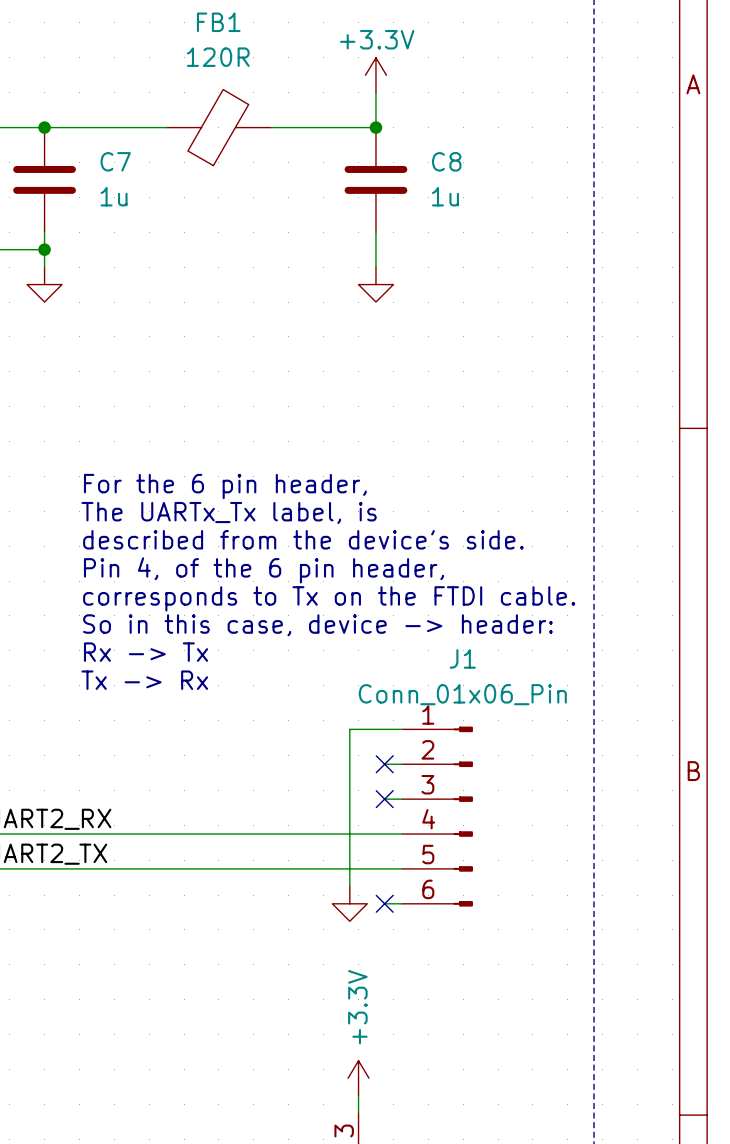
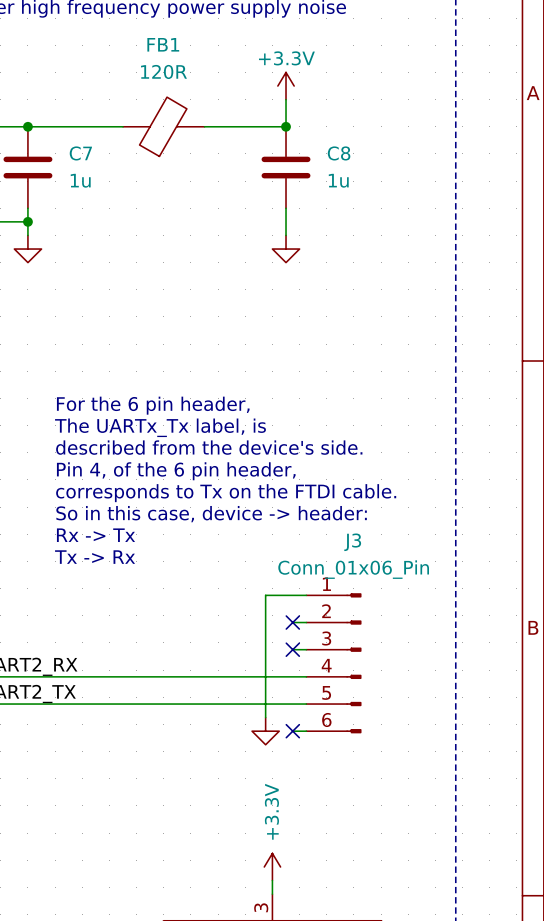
J1 name: J1 (462, 658) -> J3 (352, 542)

